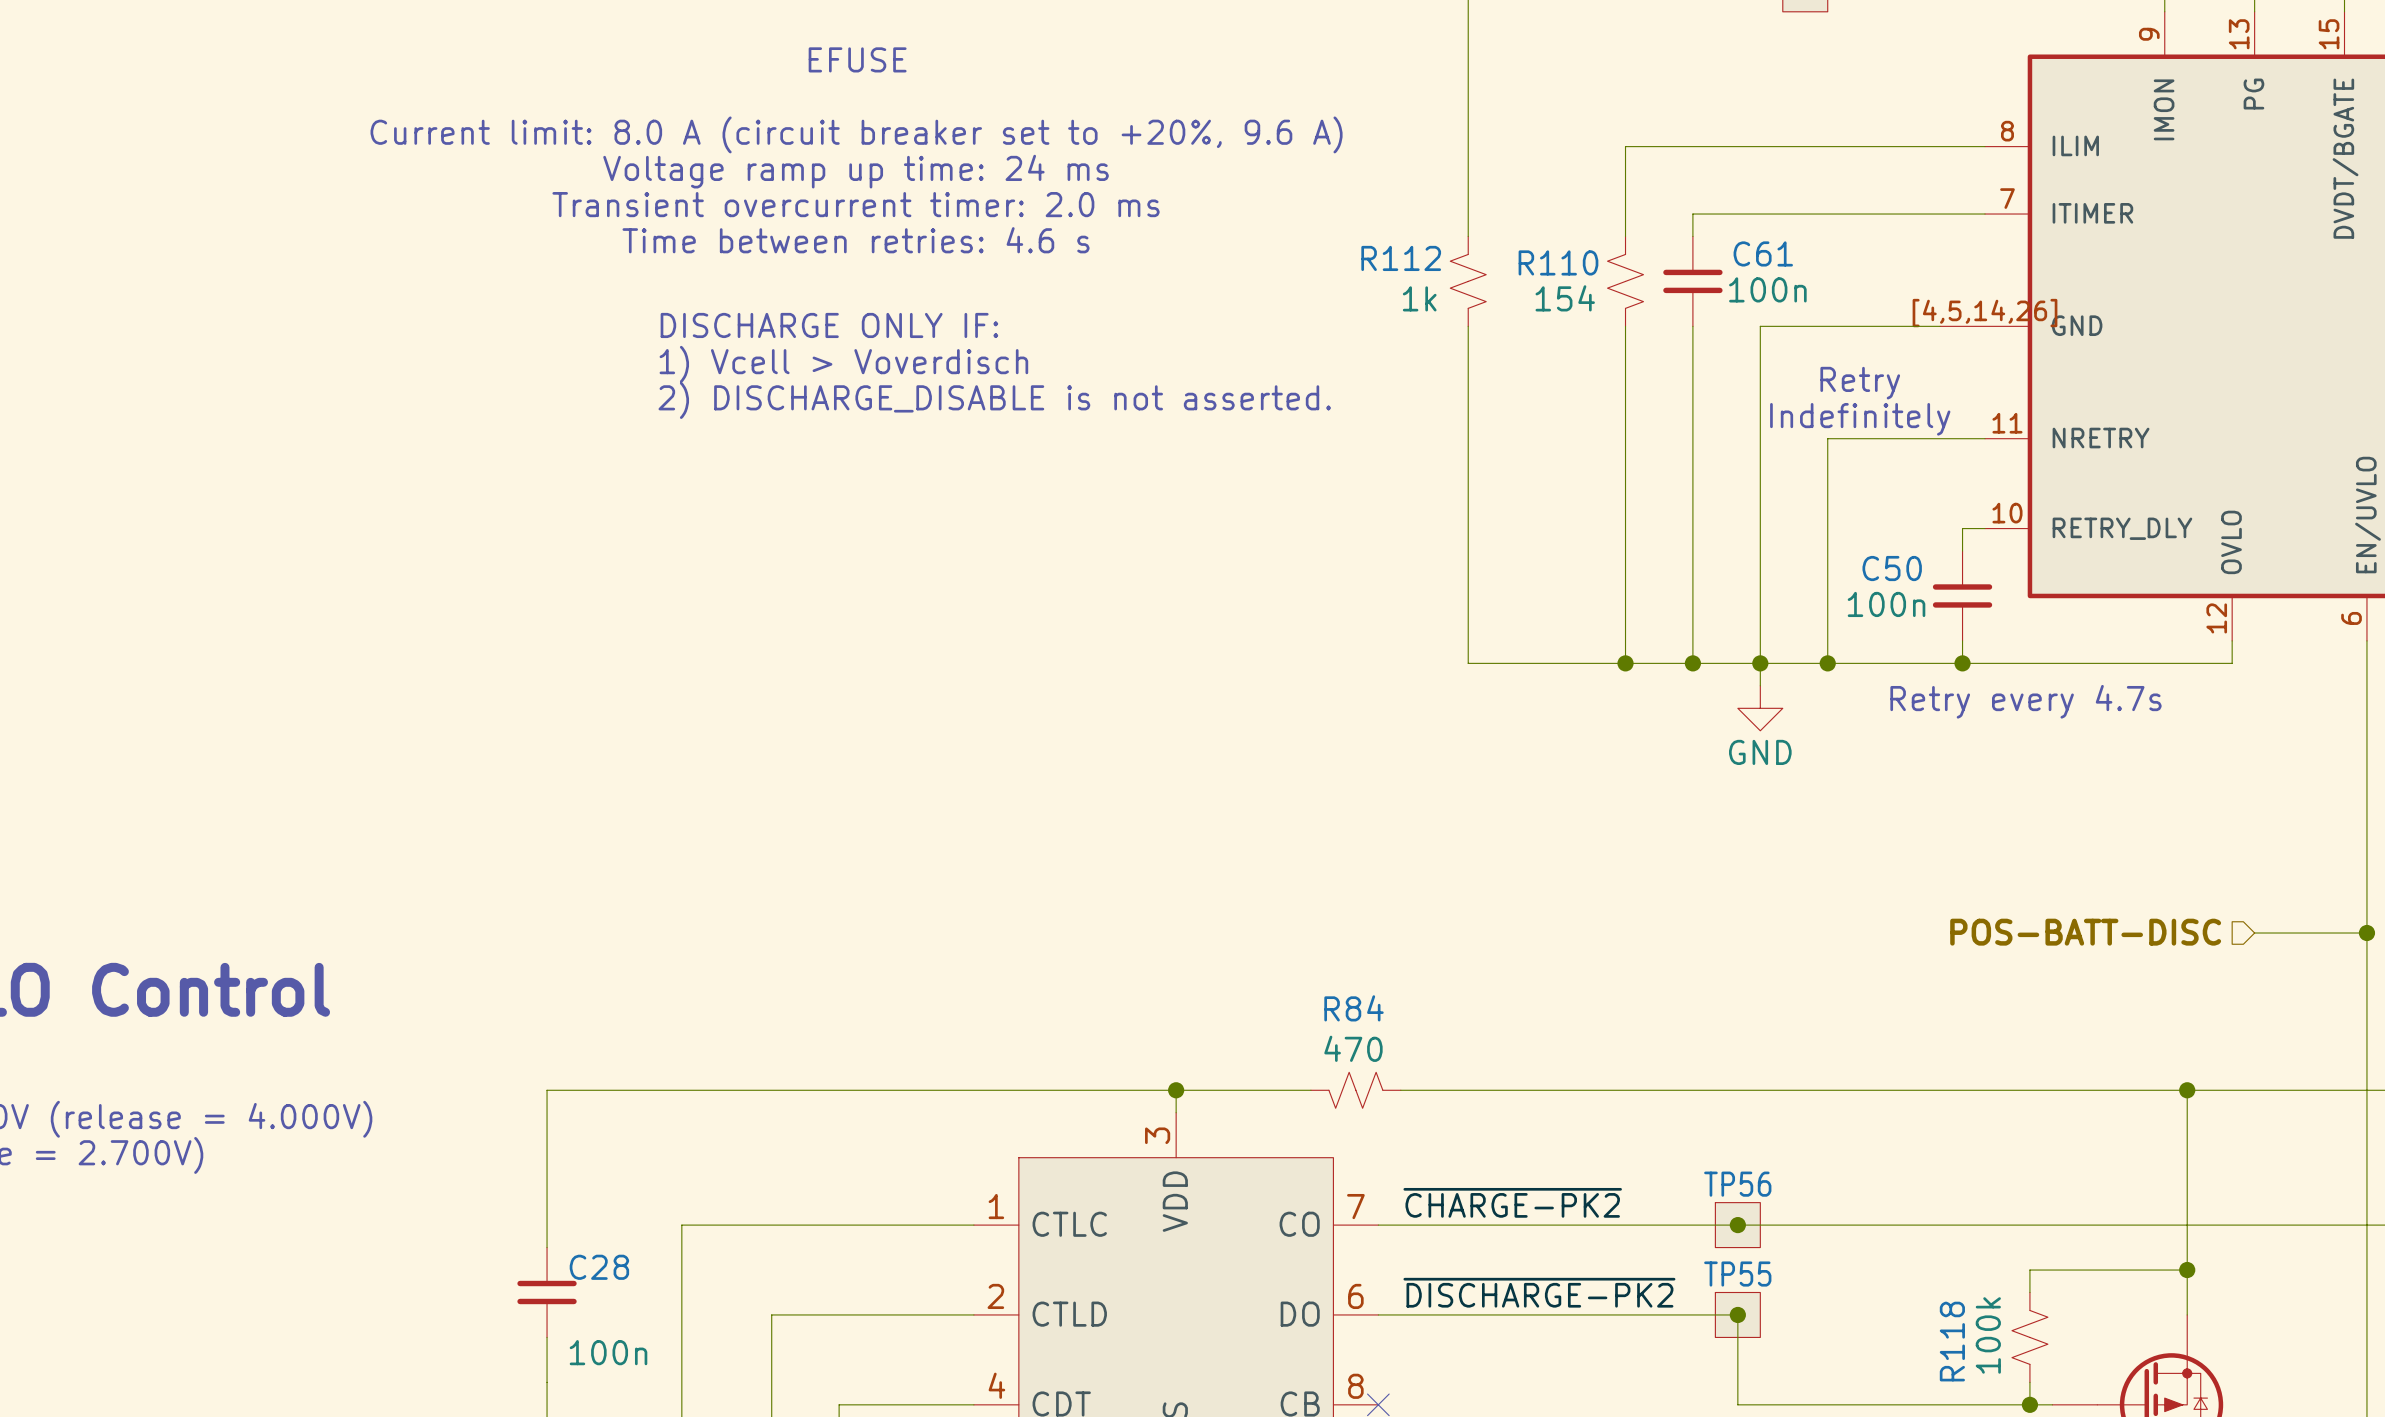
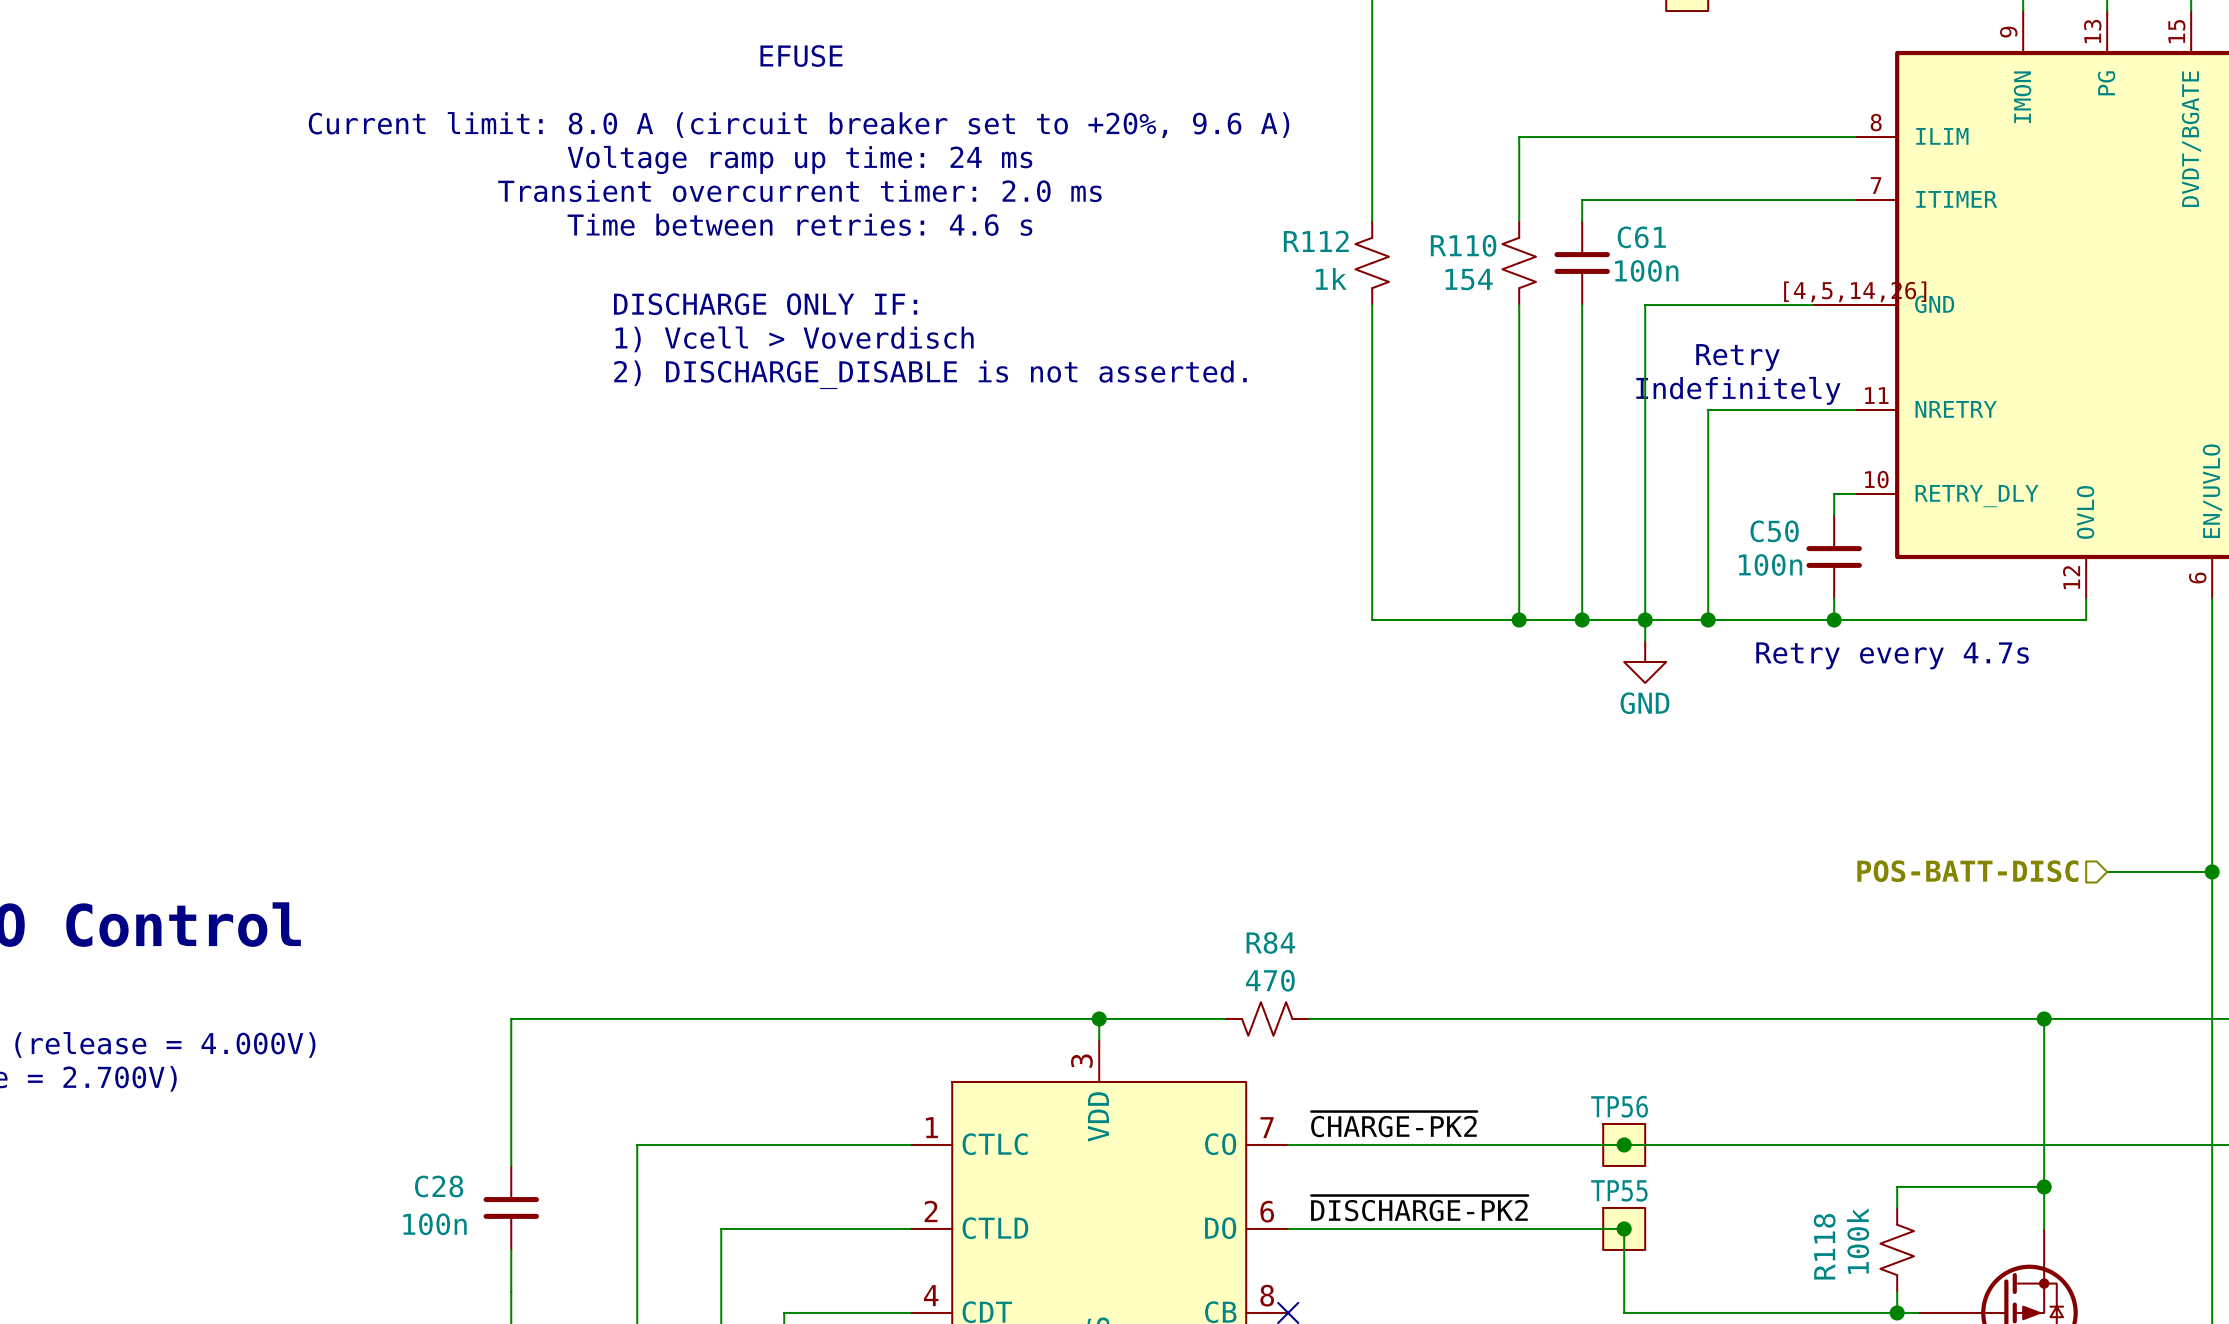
C28 name position: C28 (599, 1267) -> C28 (439, 1186)
C28 value position: 100n (608, 1352) -> 100n (435, 1224)

